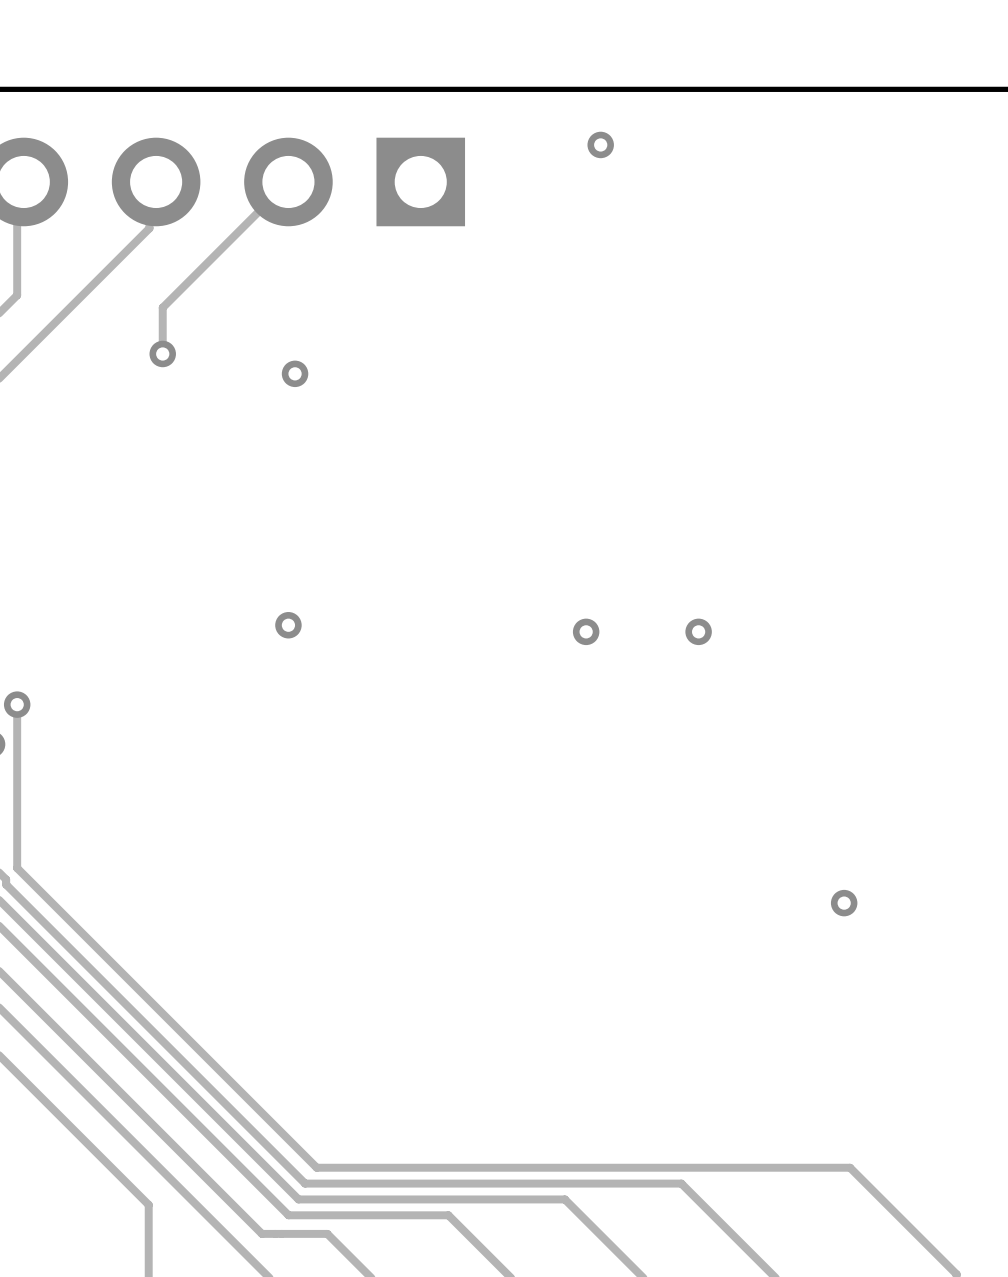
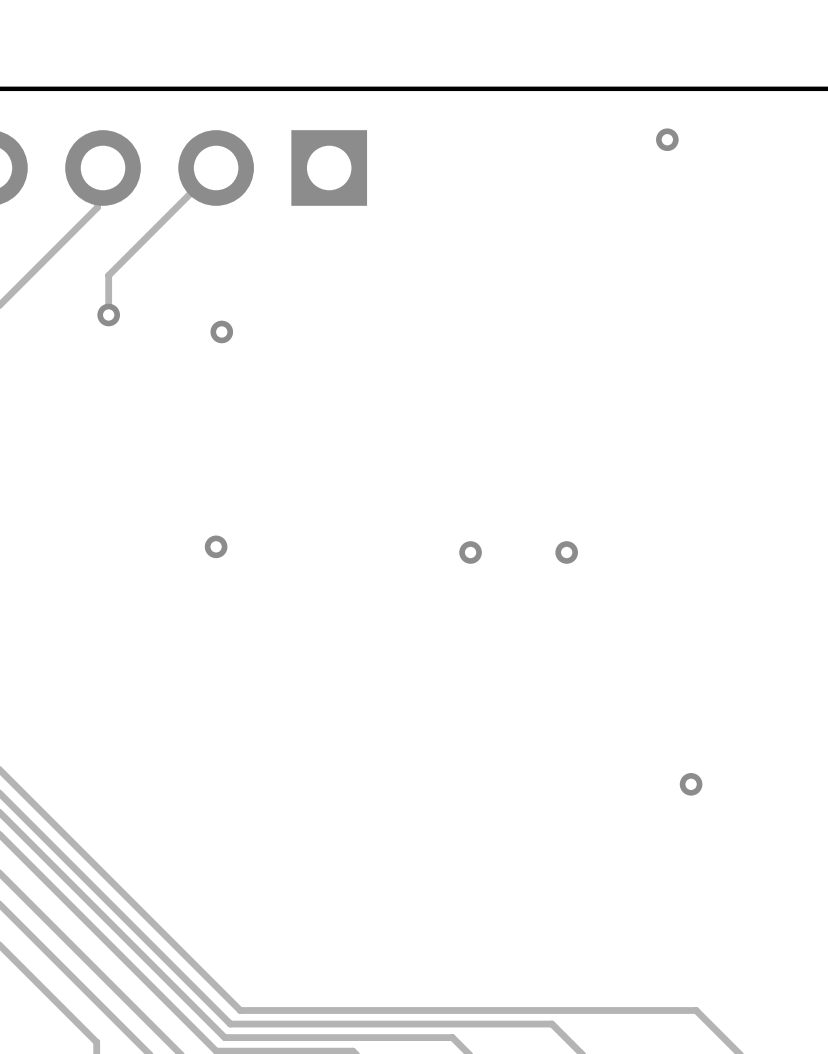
via position: (600, 144) -> (667, 139)

